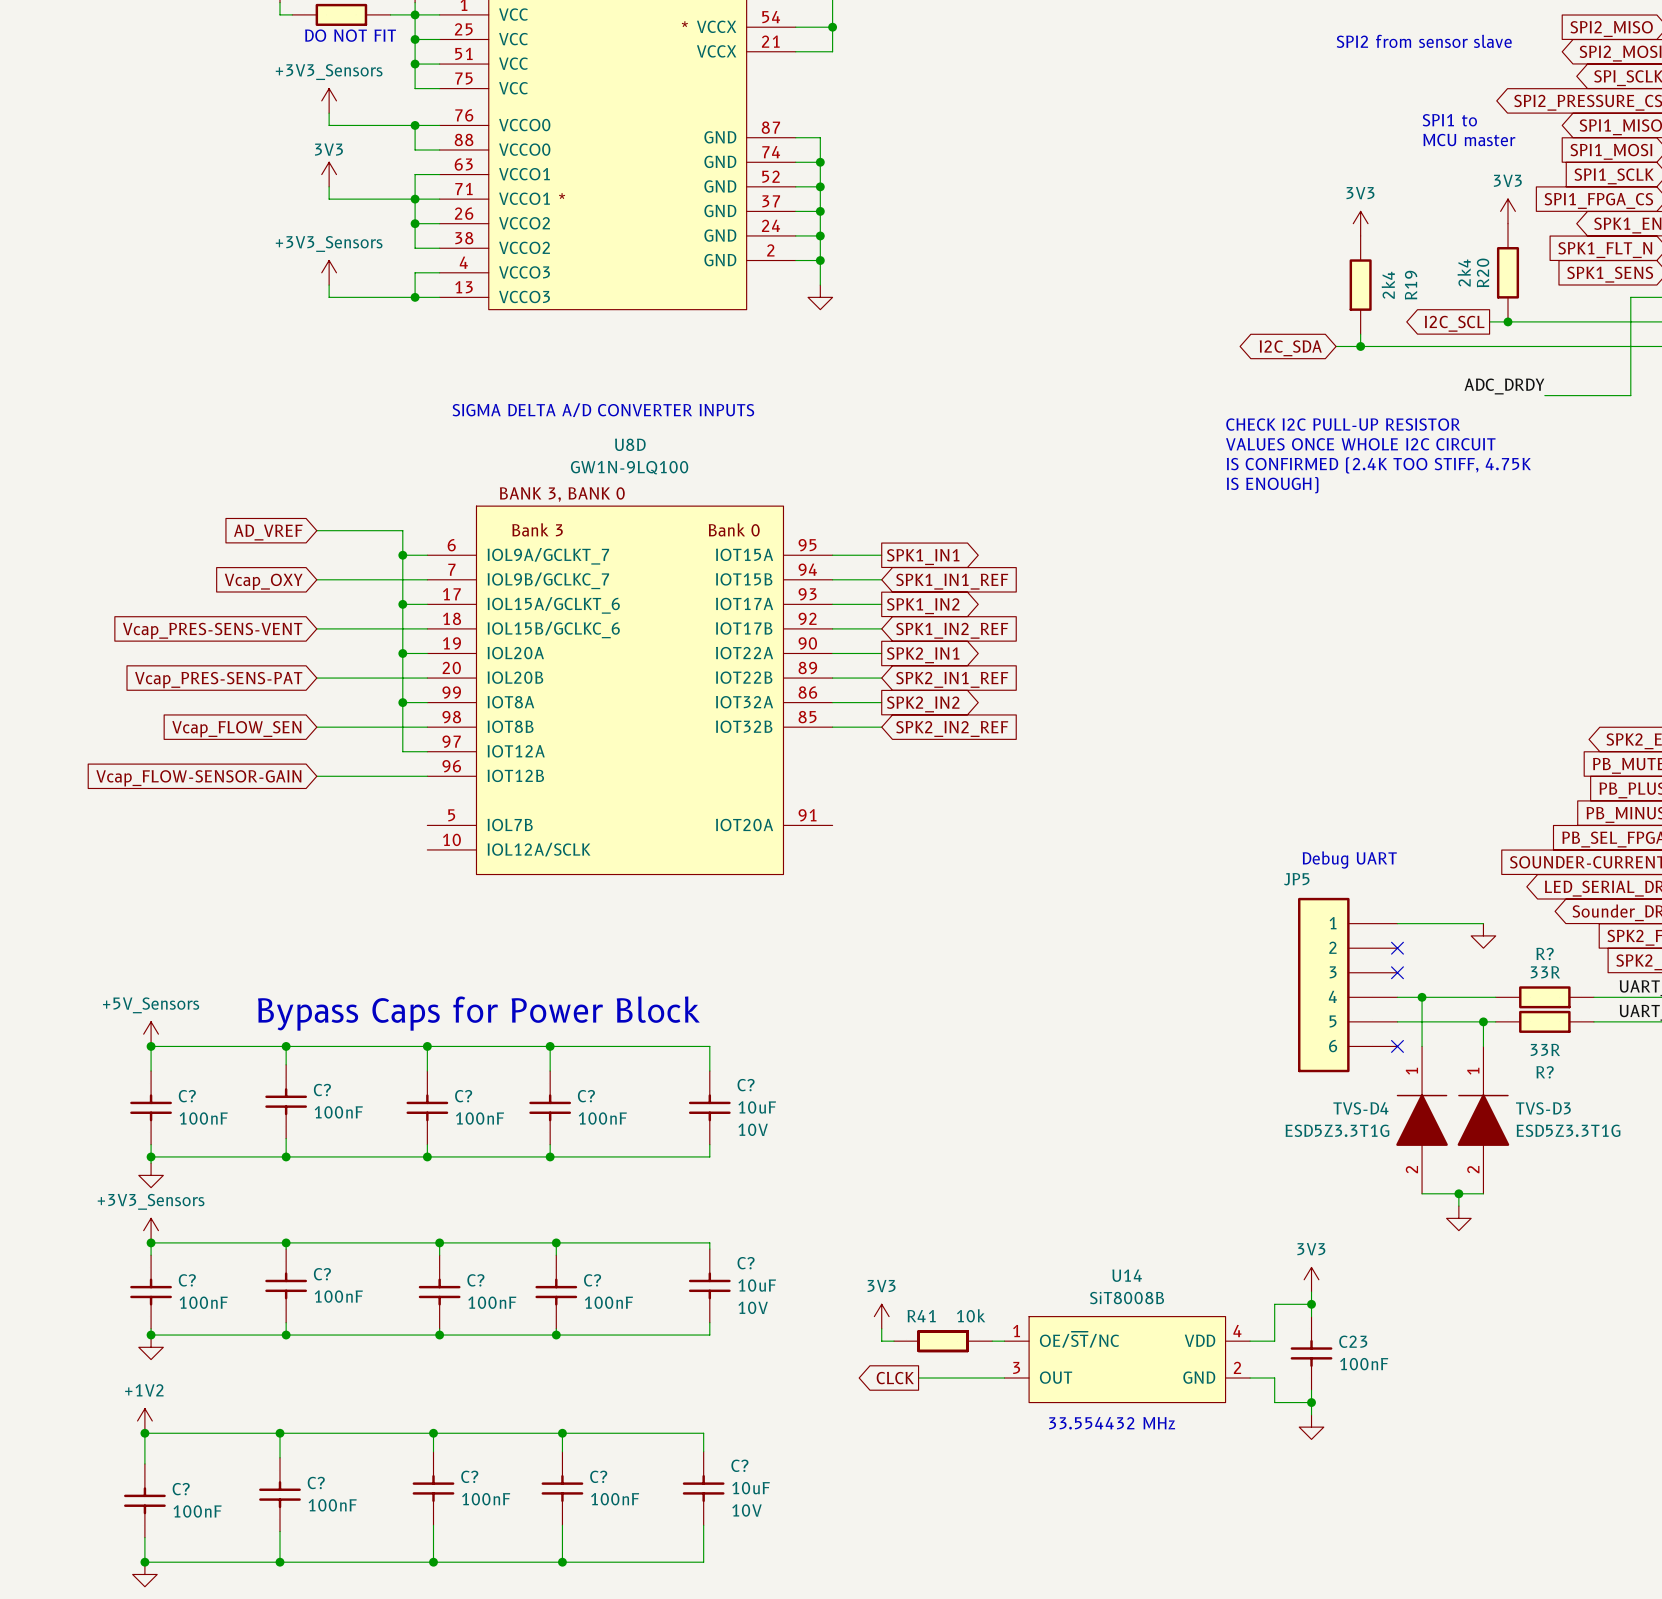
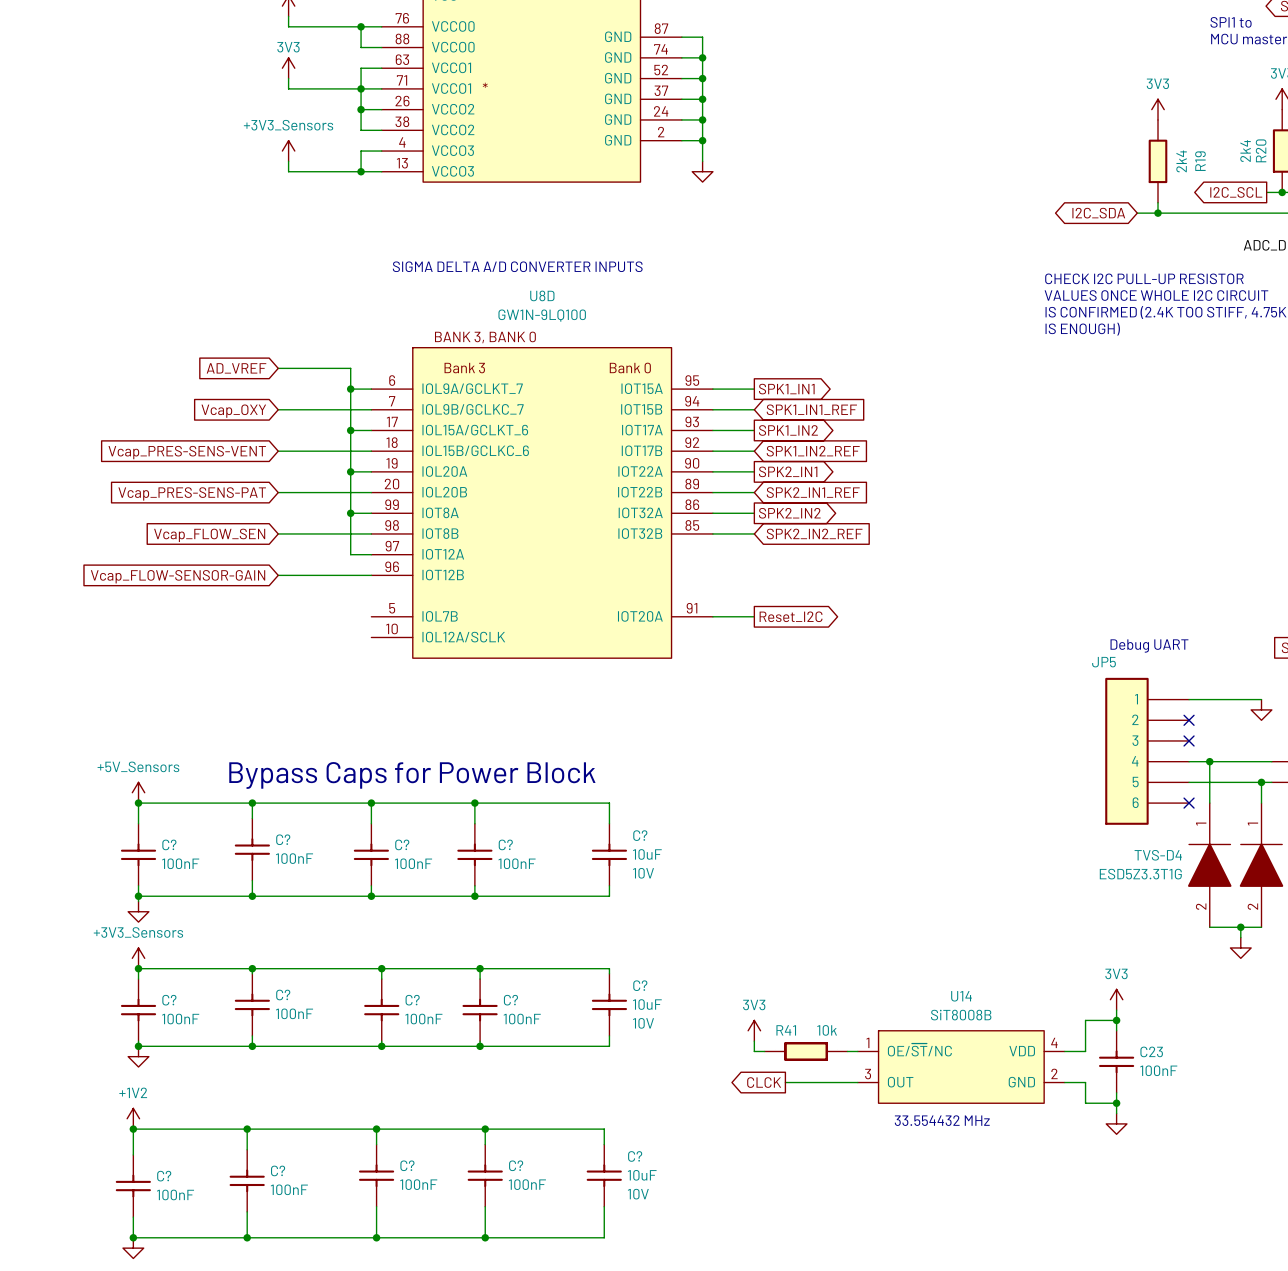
wire: none -> (712, 616) (754, 616)
global label: none -> Reset_I2C (791, 616)

